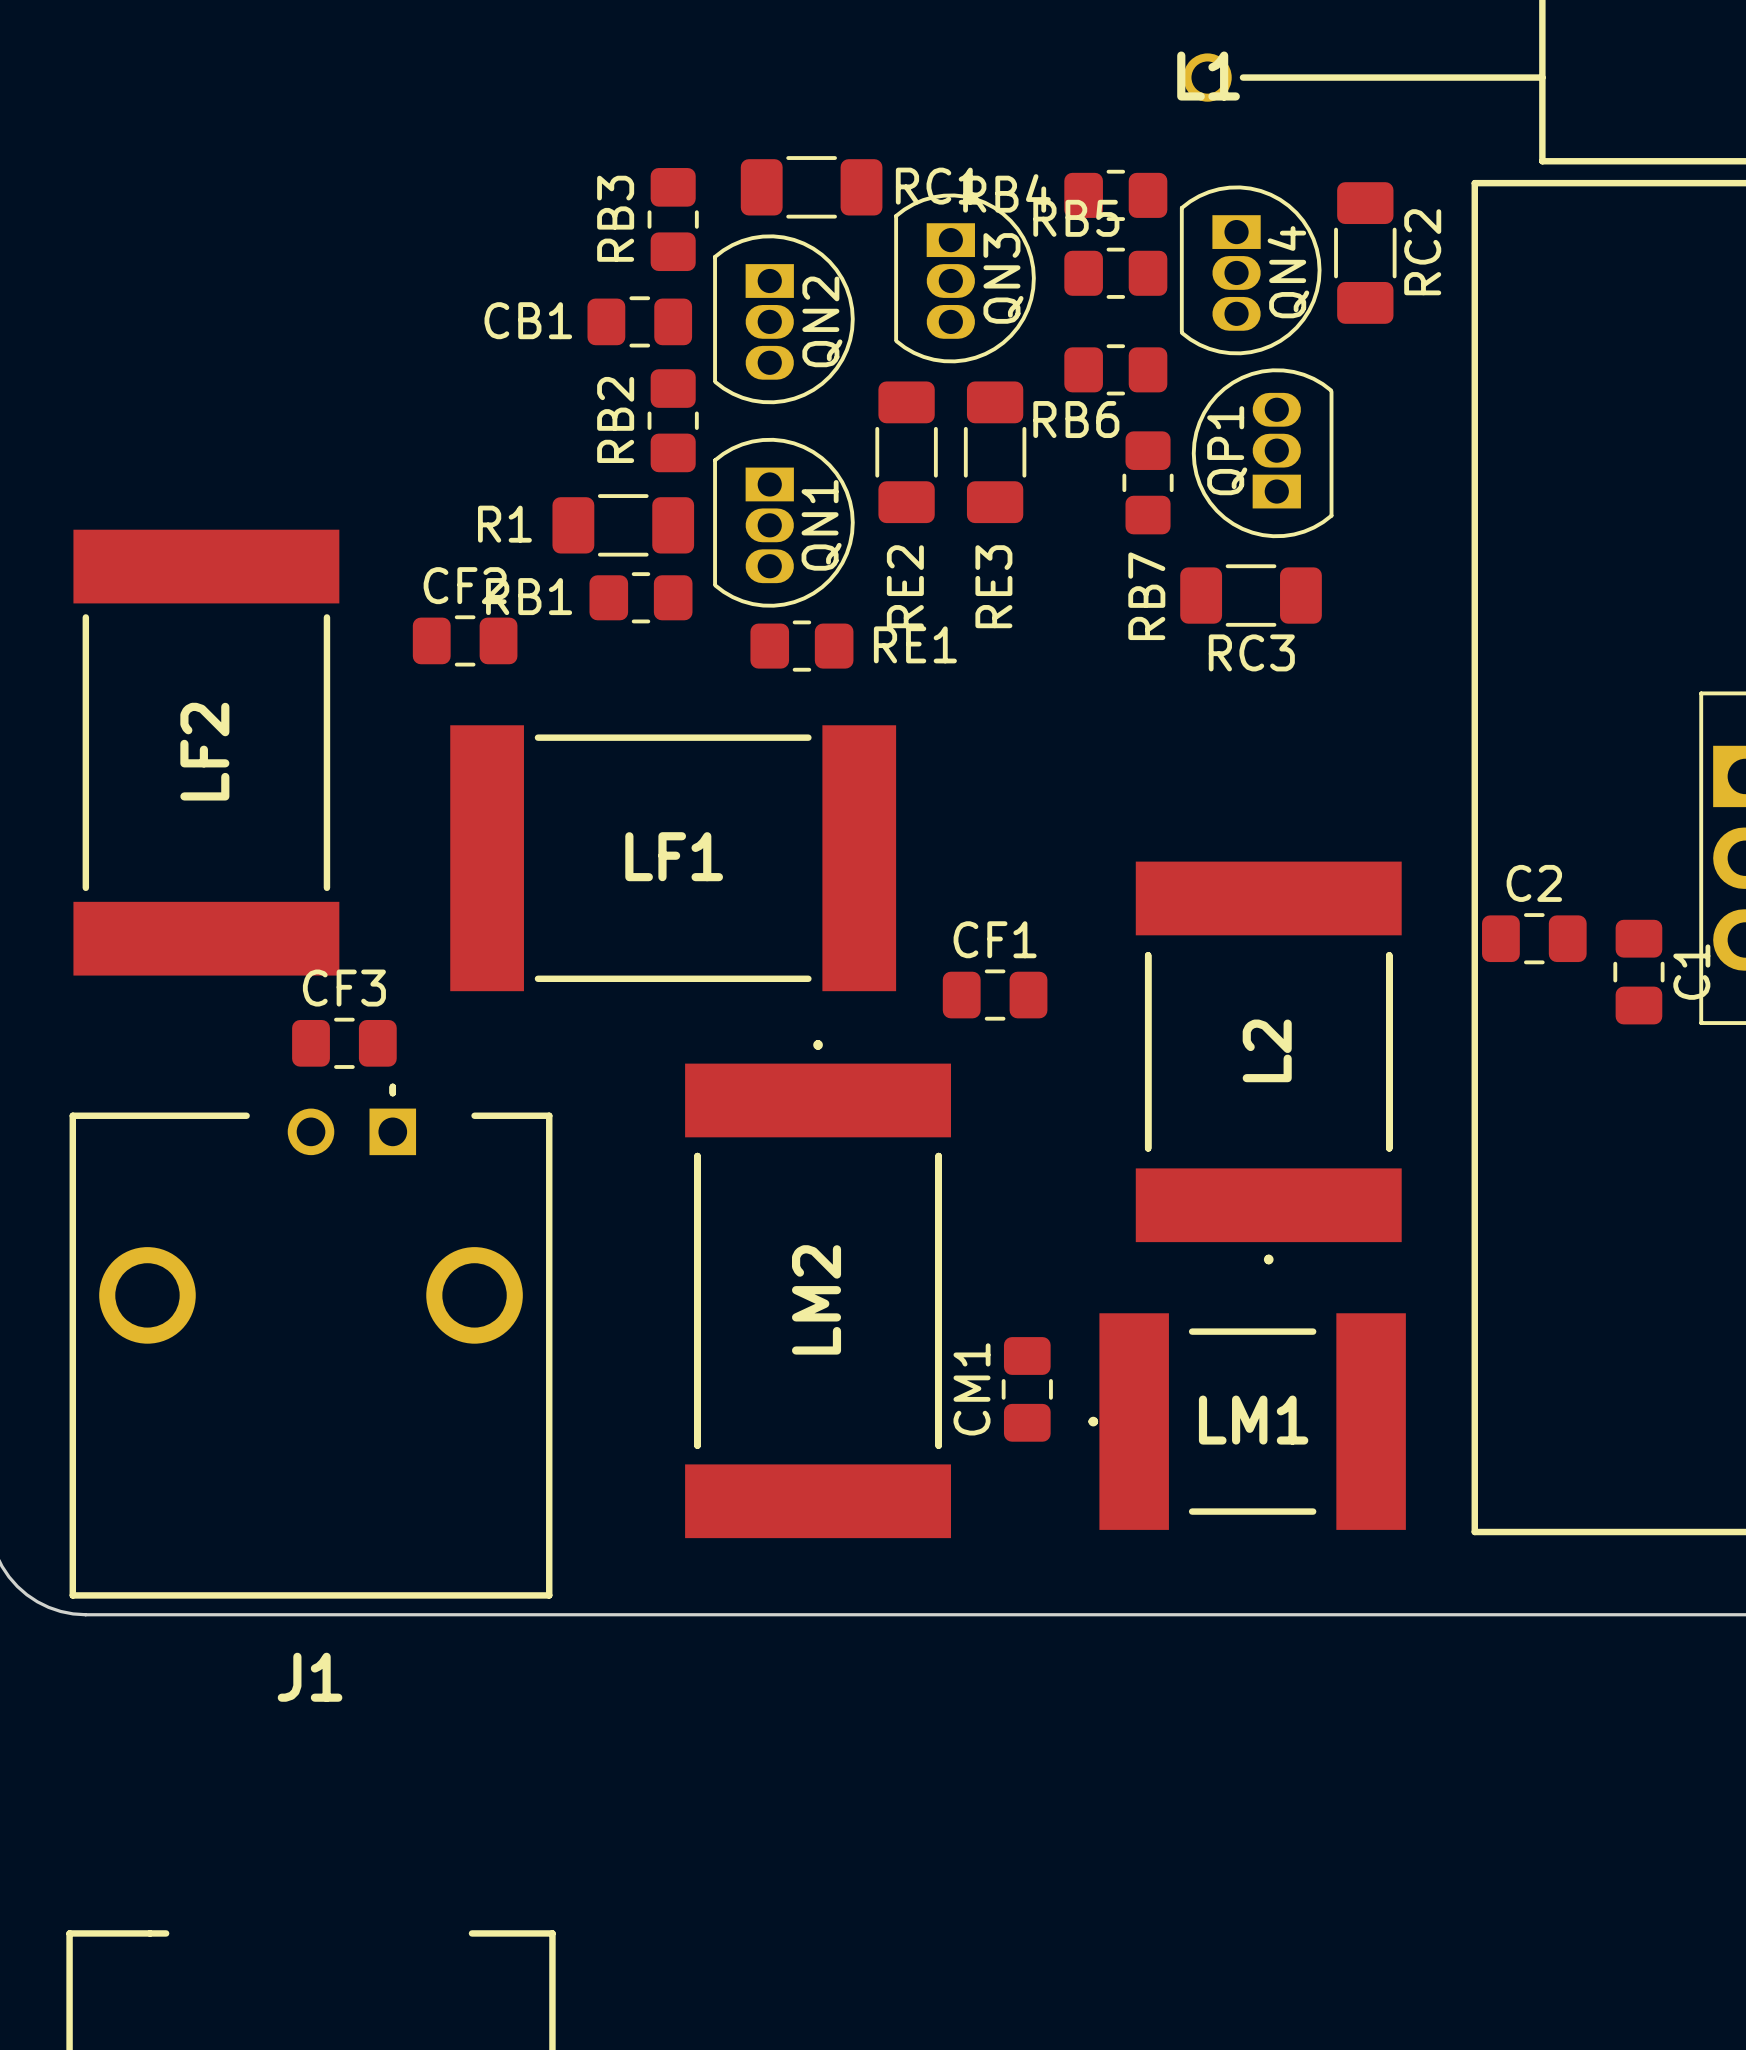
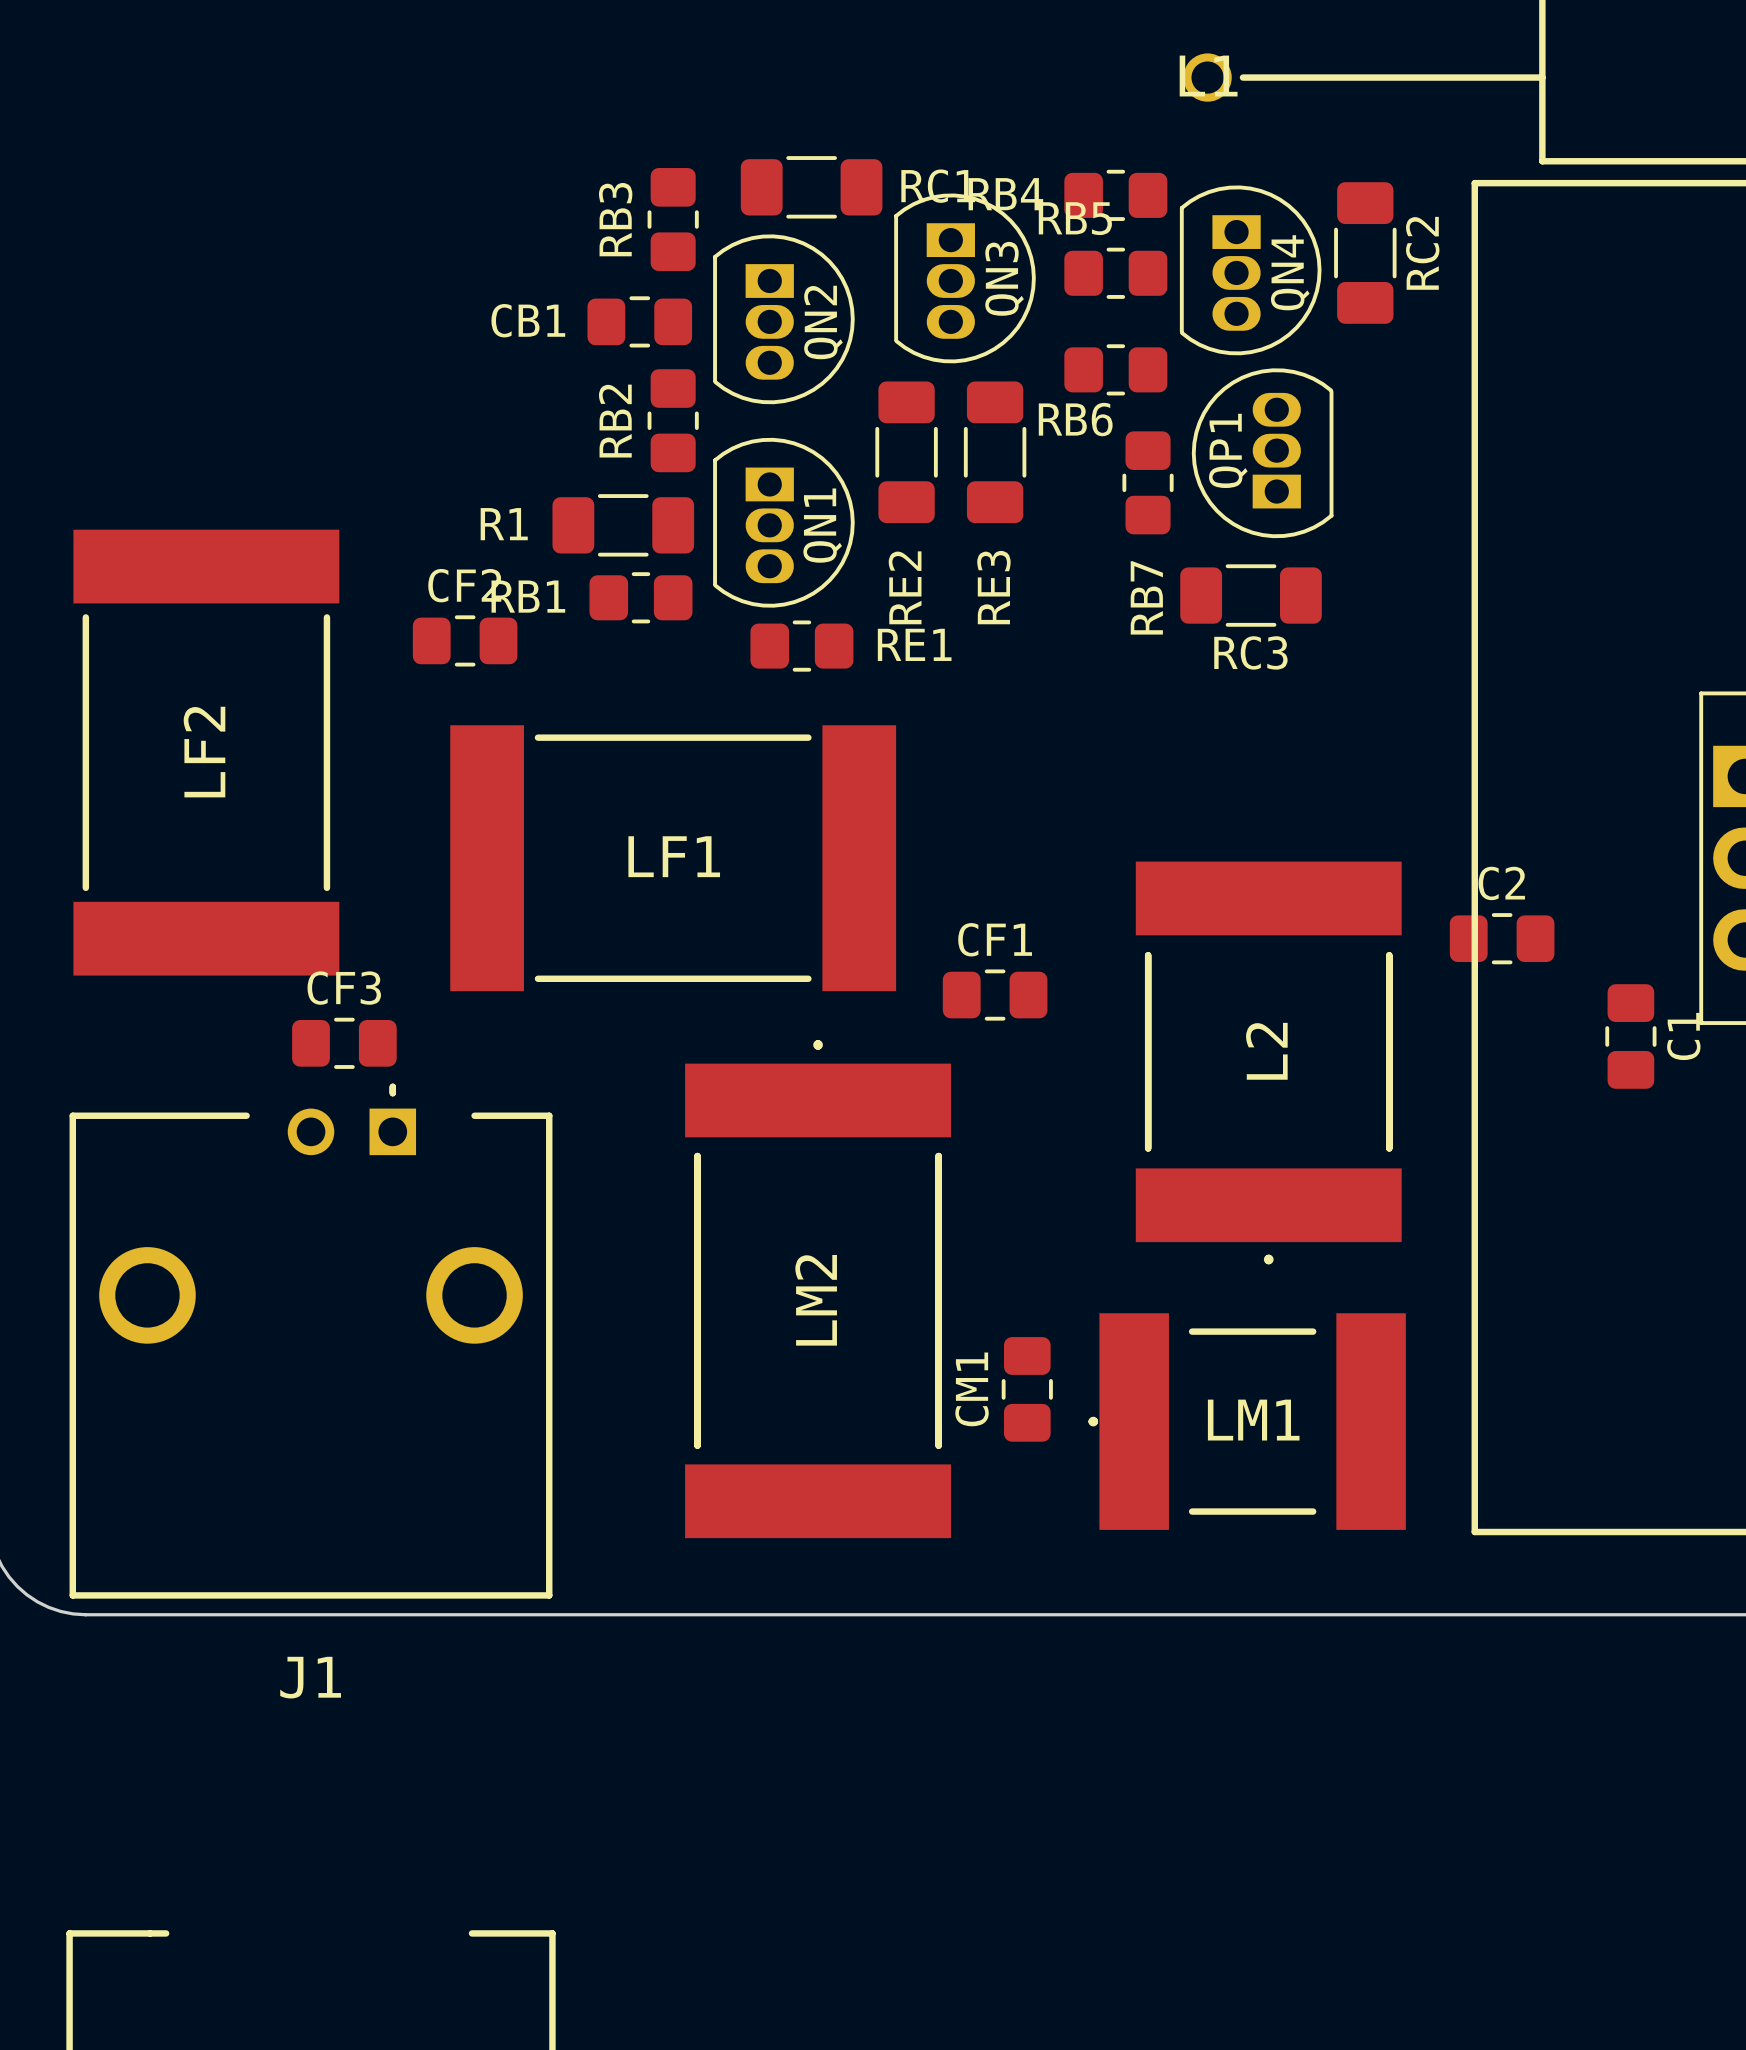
C2 position: (1534, 938) -> (1502, 938)
C1 position: (1638, 972) -> (1630, 1036)

